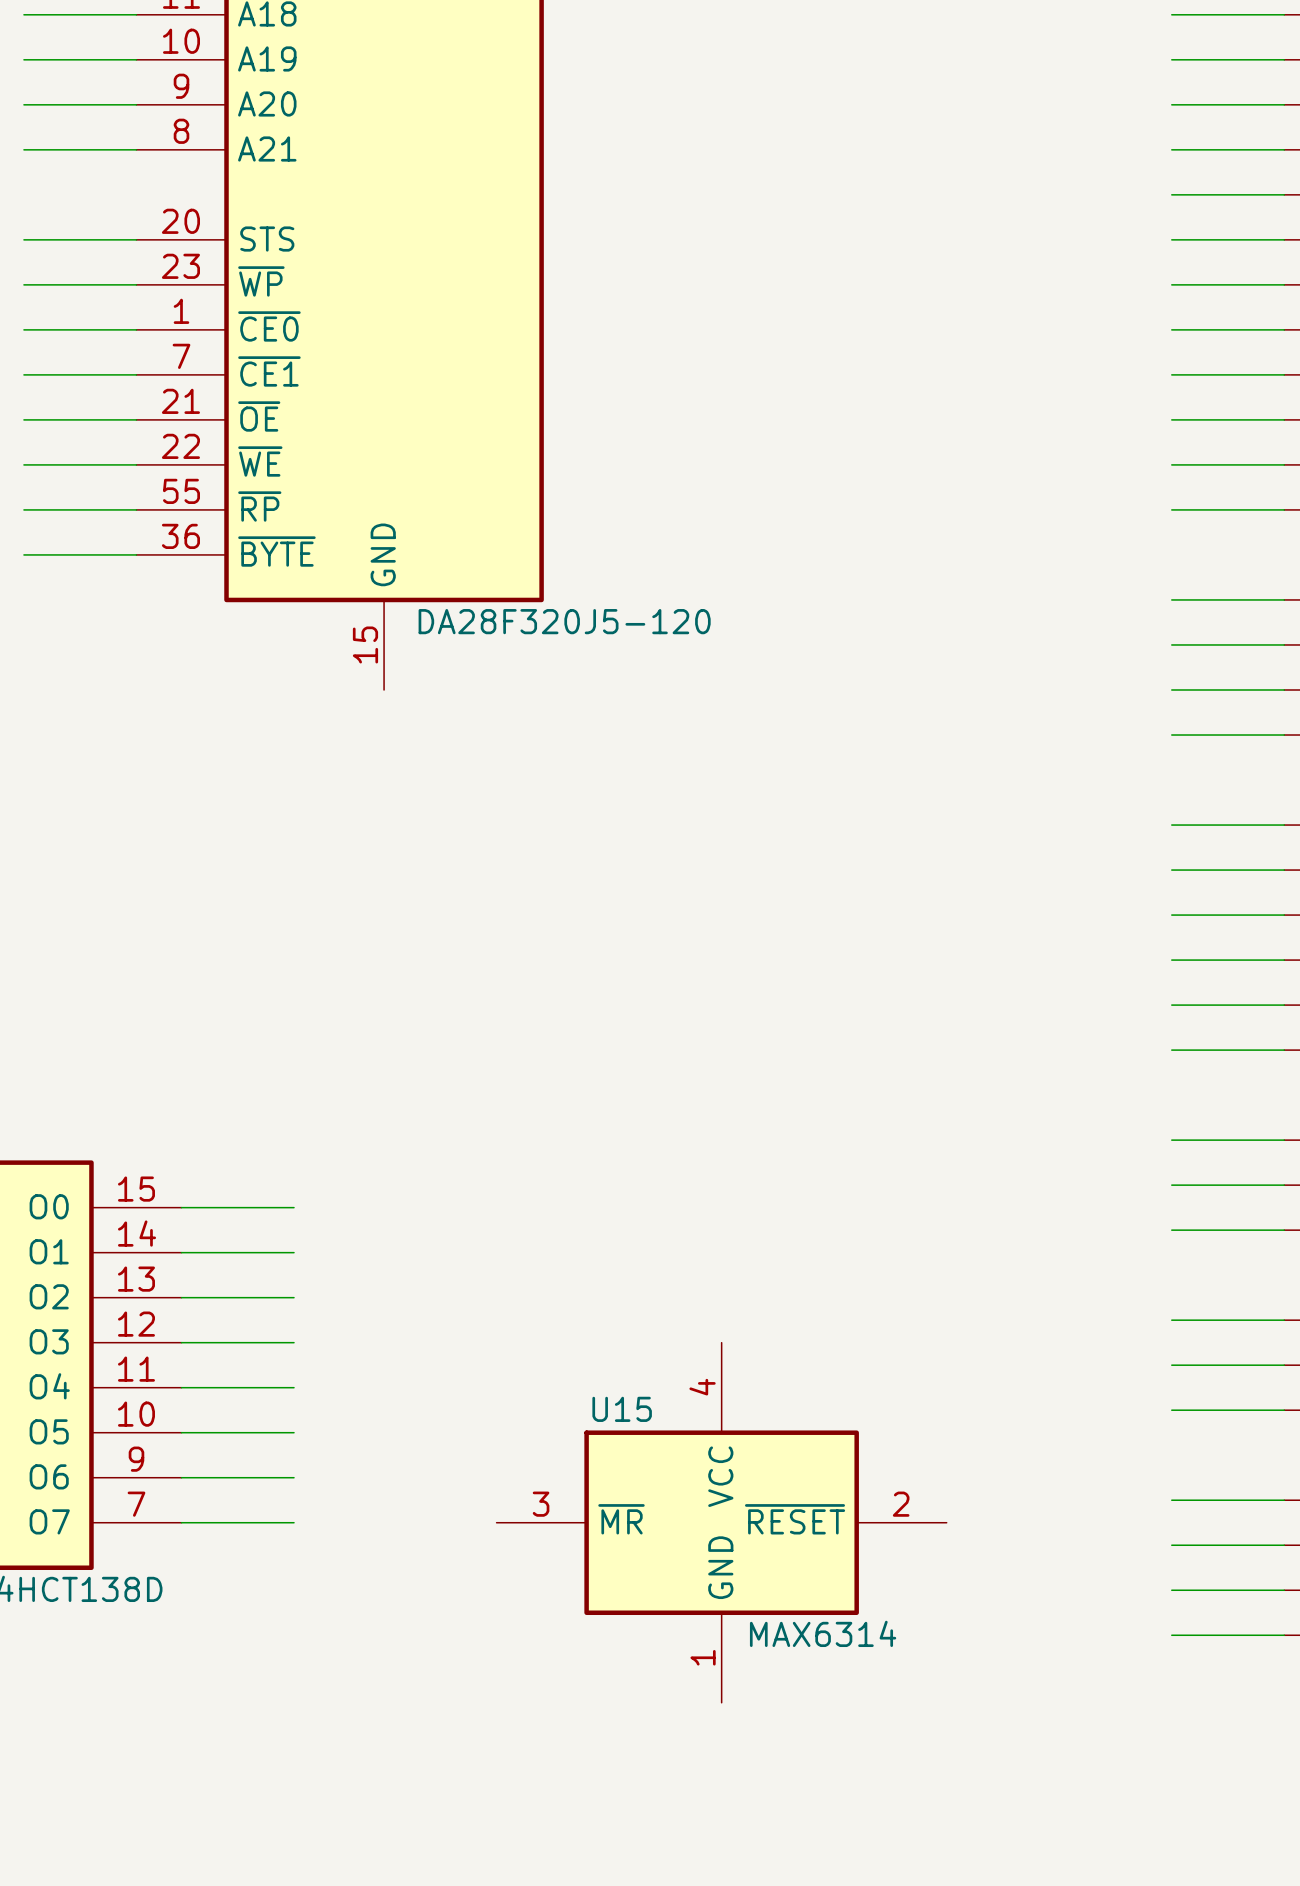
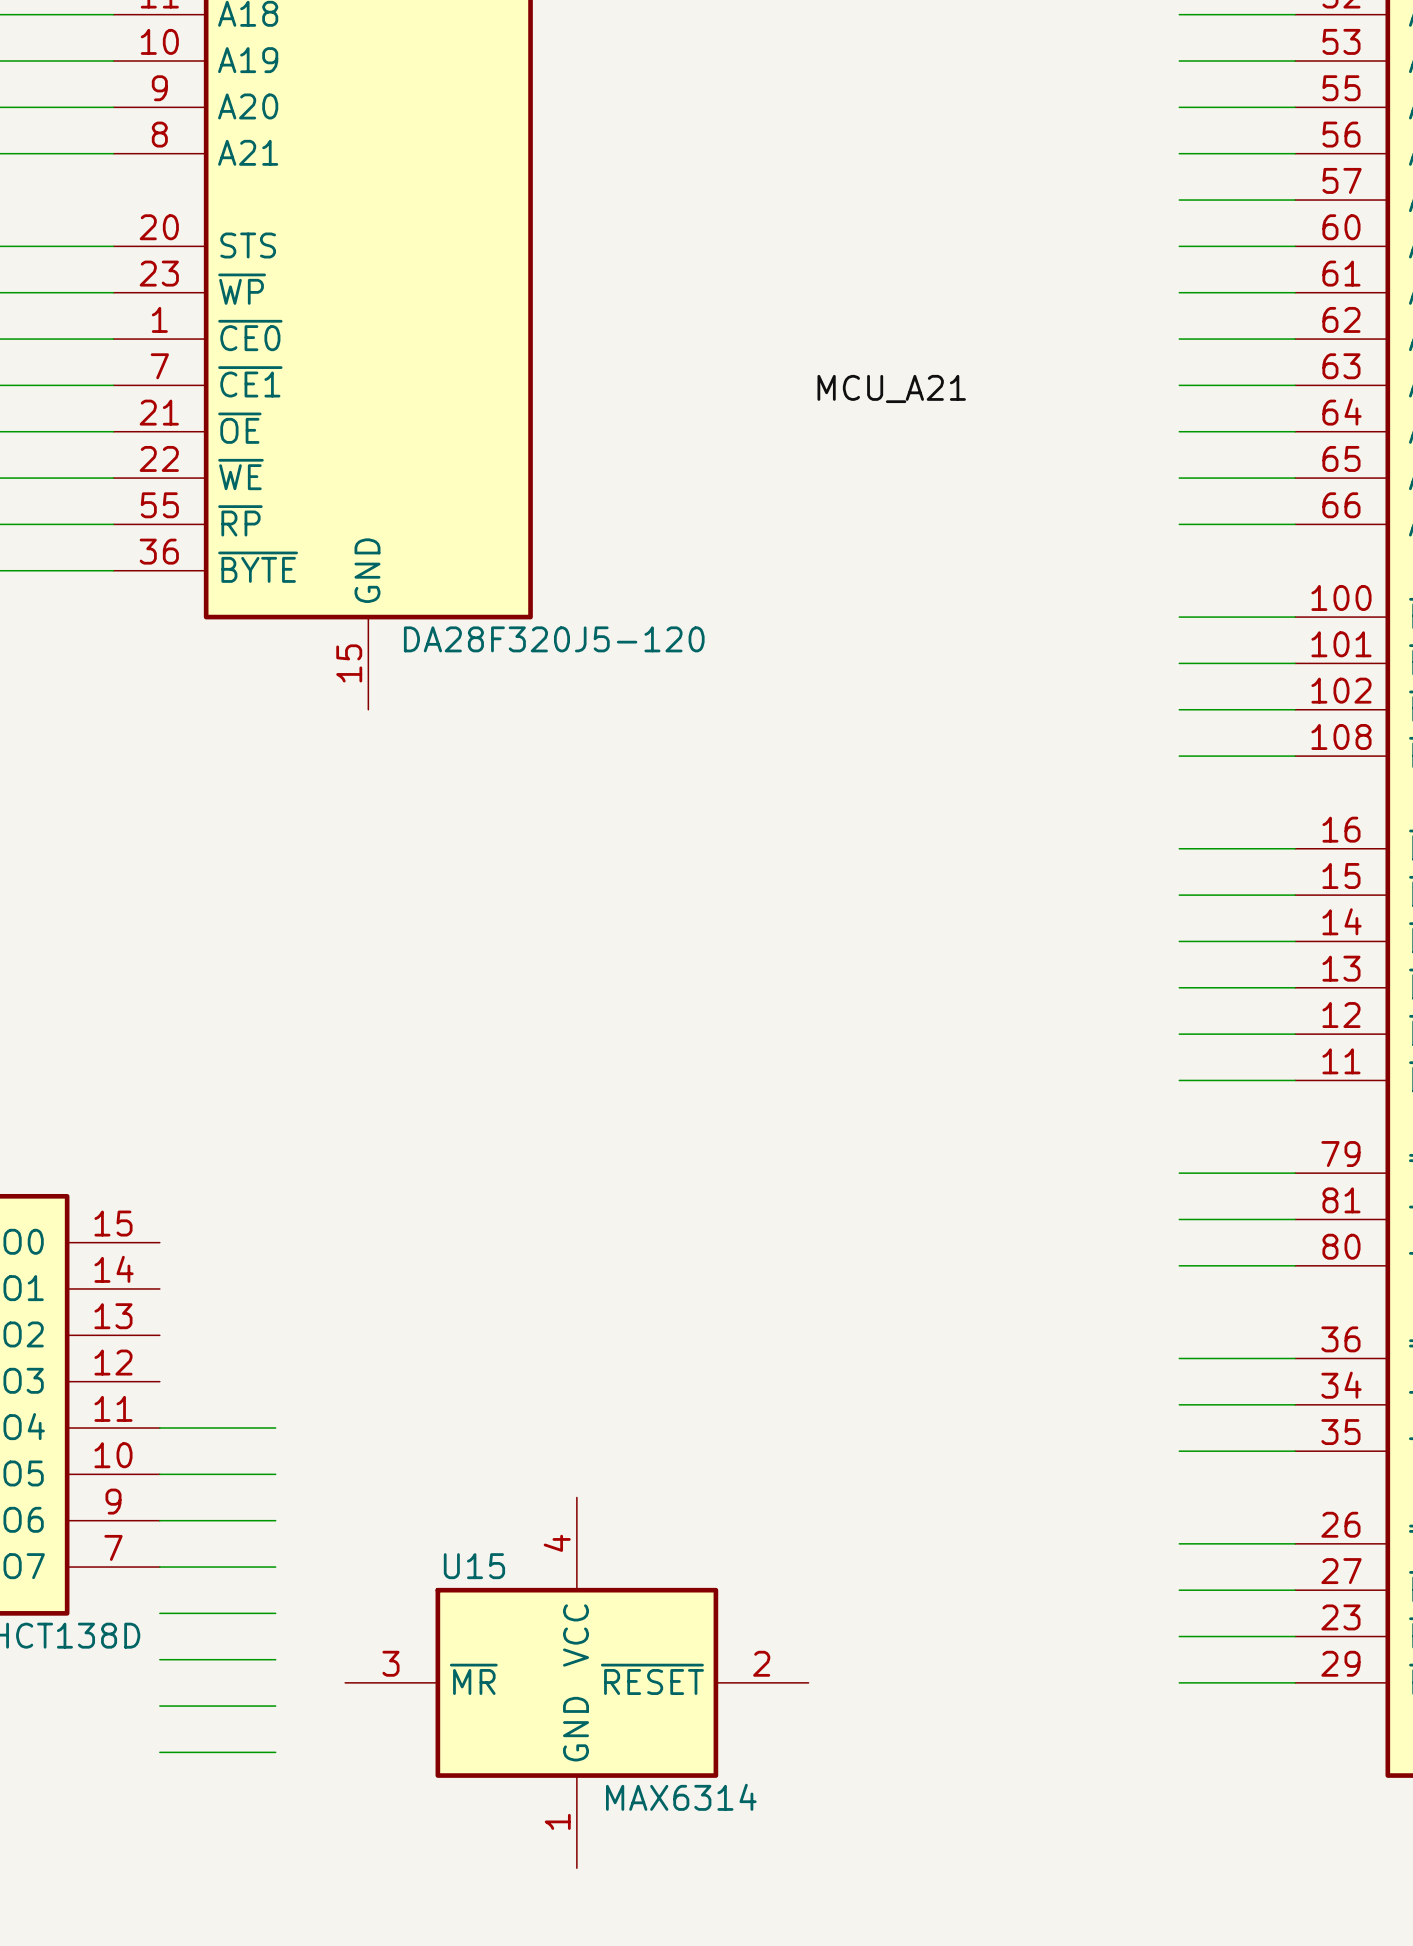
label: none -> MCU_A21 (891, 388)
wire: (181, 1207) (294, 1207) -> (159, 1613) (275, 1613)
wire: (181, 1252) (294, 1252) -> (159, 1659) (275, 1659)
wire: (181, 1297) (294, 1297) -> (159, 1706) (275, 1706)
wire: (181, 1342) (294, 1342) -> (159, 1752) (275, 1752)
U15 position: (721, 1522) -> (576, 1682)

